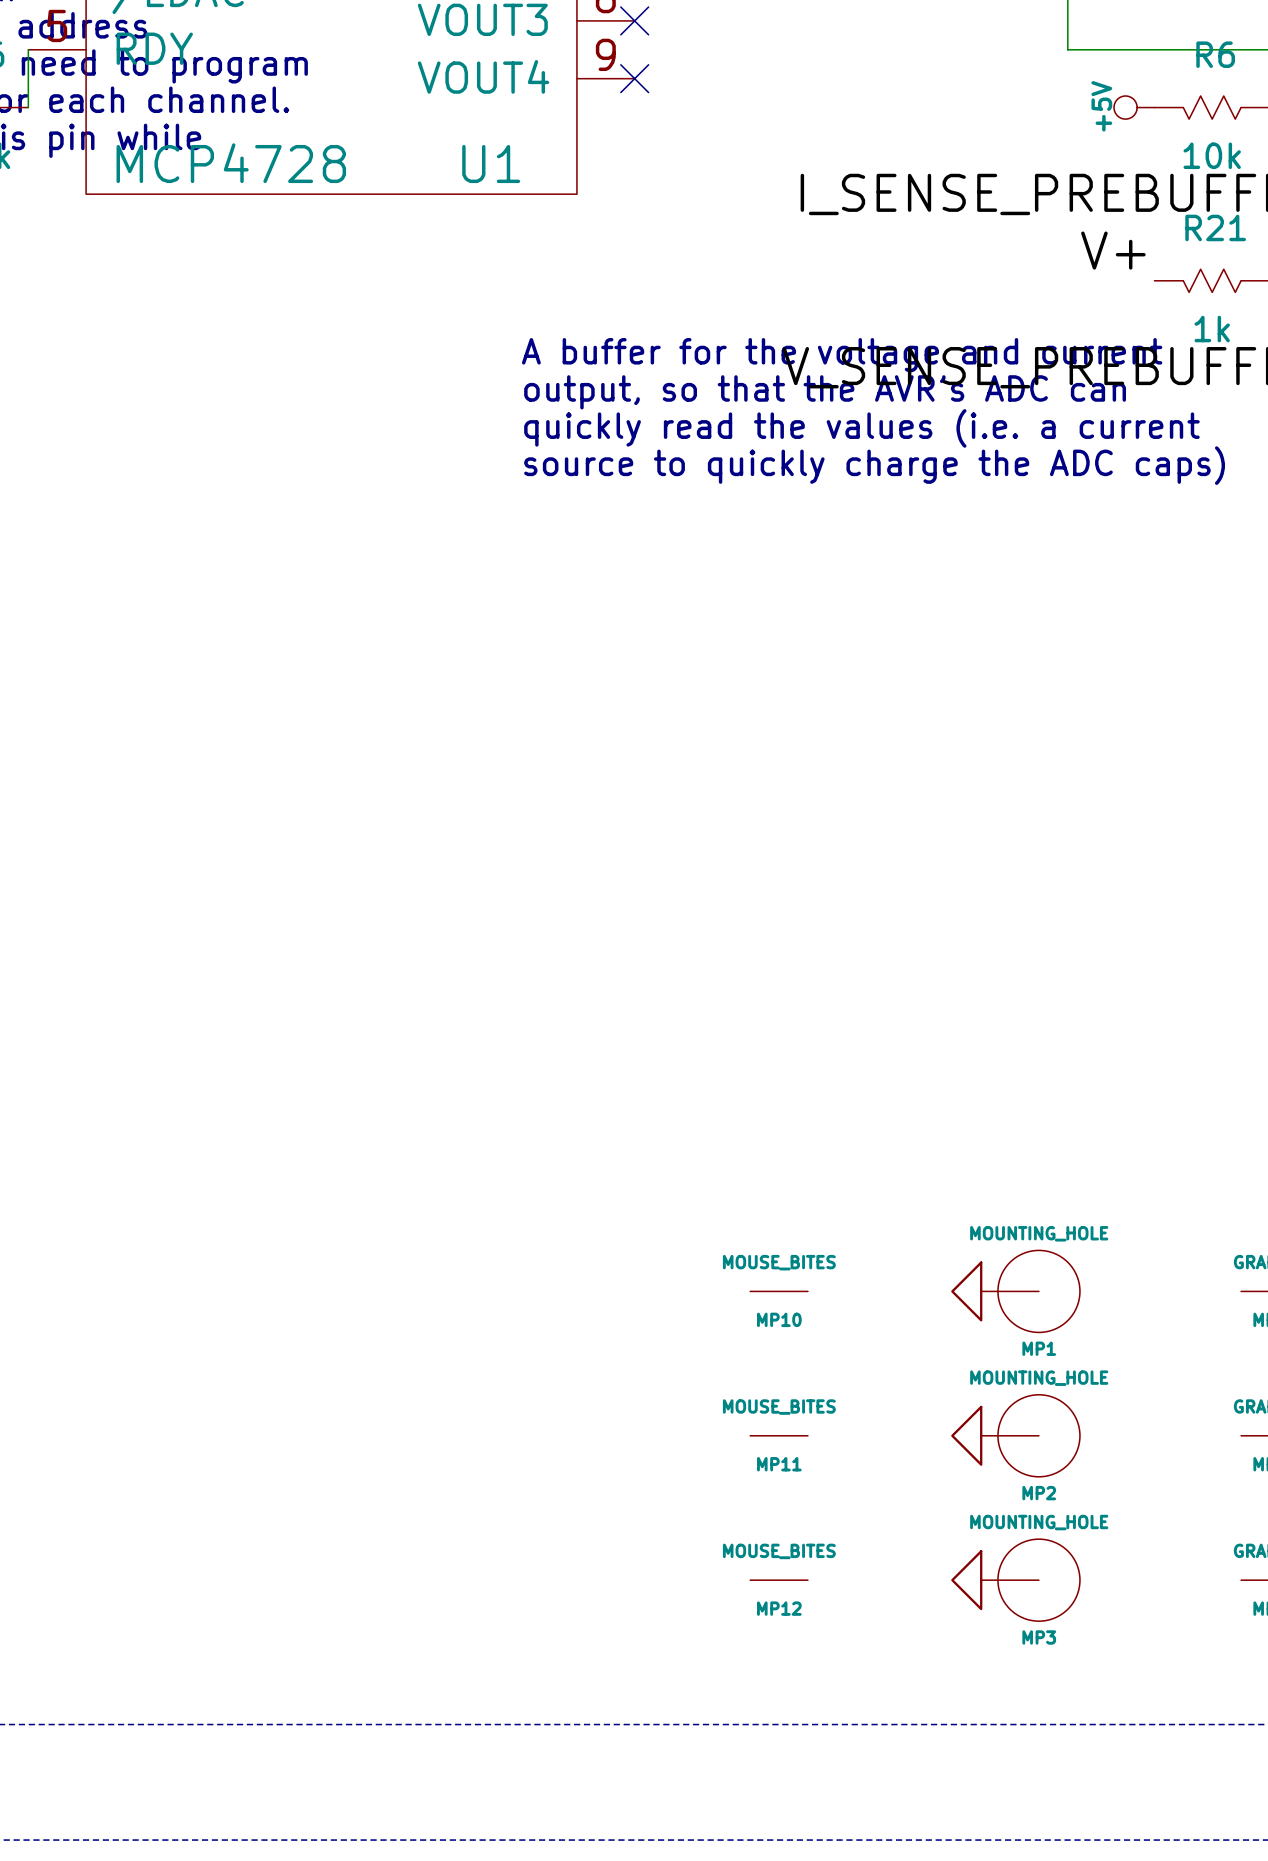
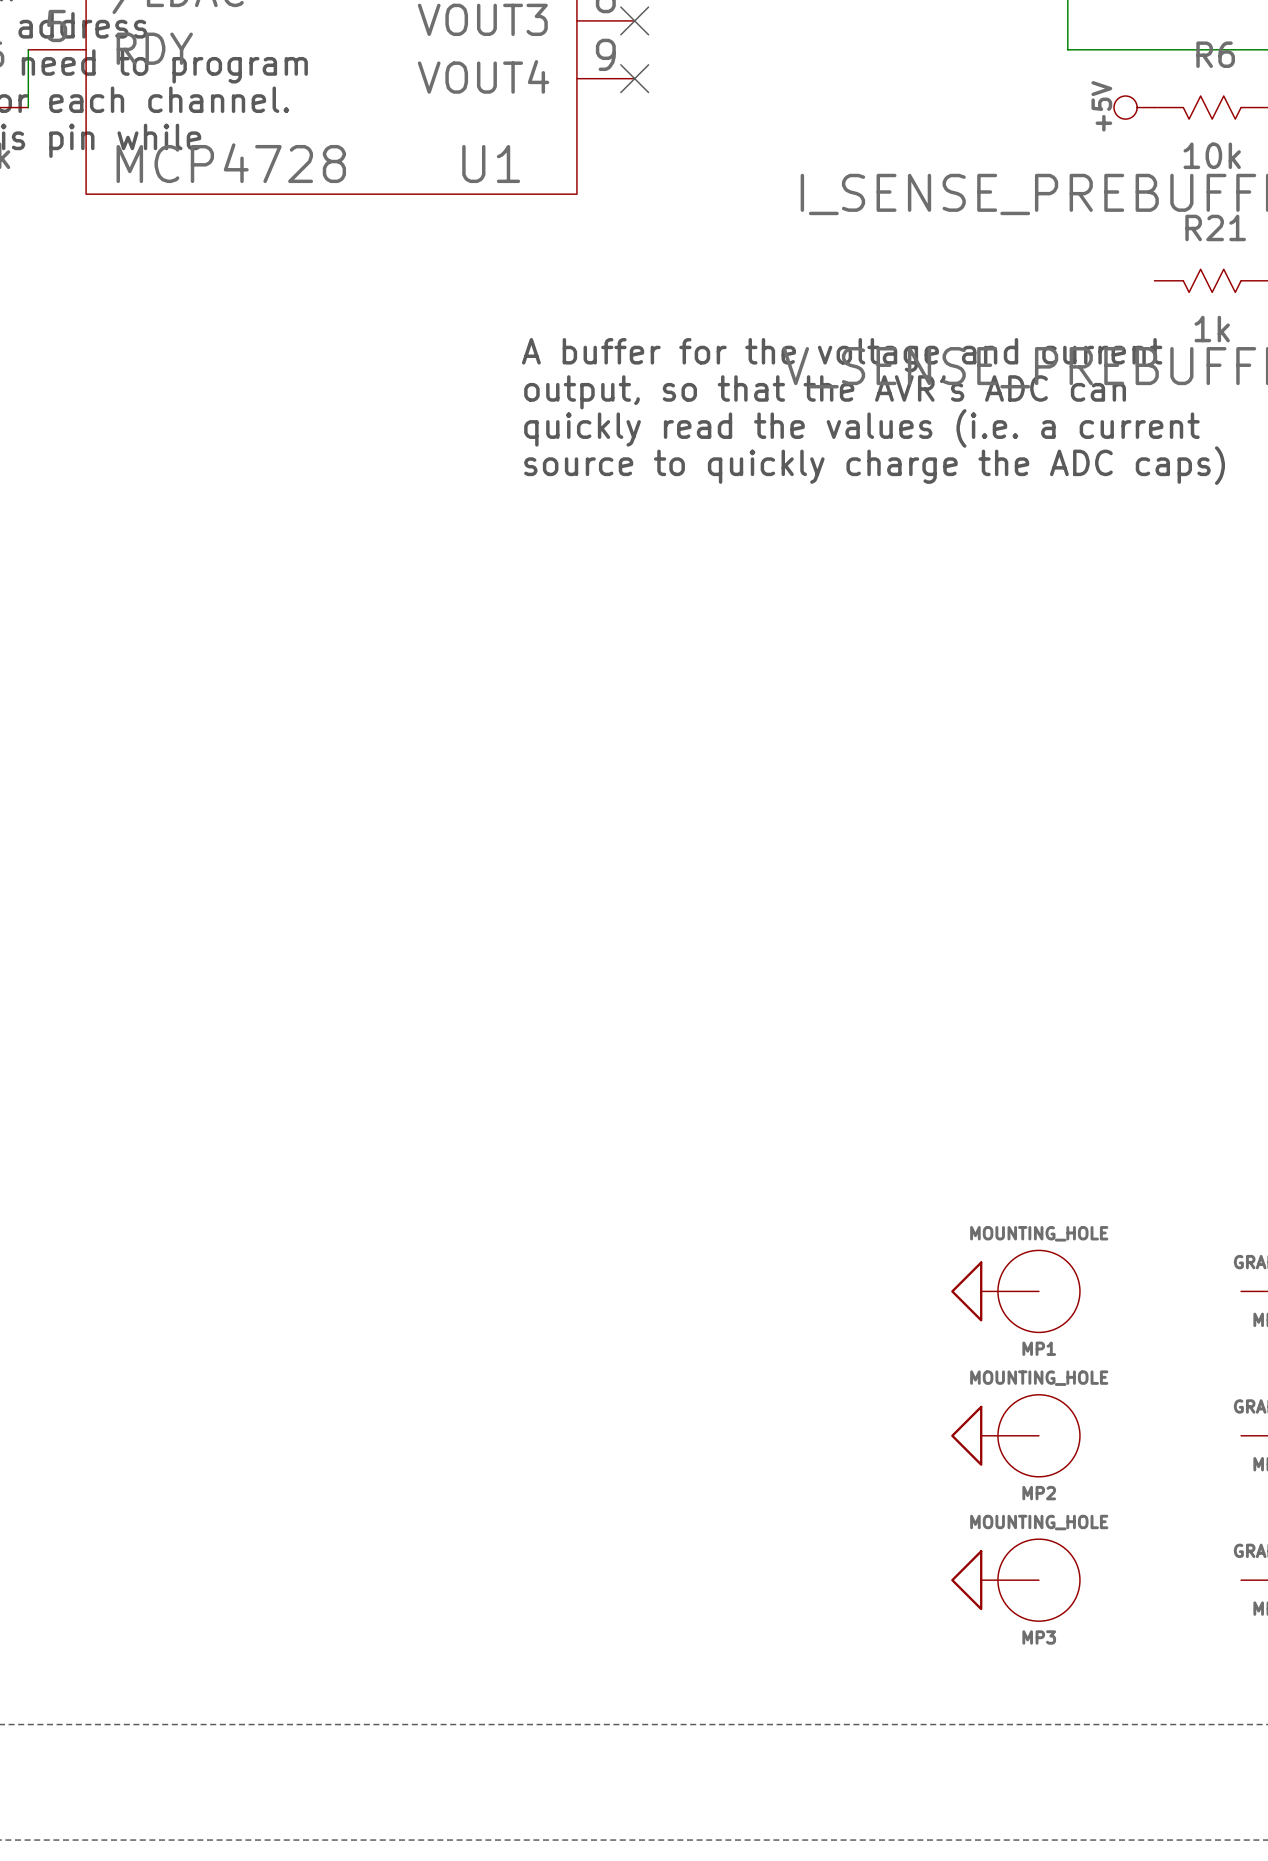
label: V+ (1113, 250) -> none
MP10: MOUSE_BITES (779, 1291) -> none
MP11: MOUSE_BITES (779, 1435) -> none
MP12: MOUSE_BITES (779, 1580) -> none

